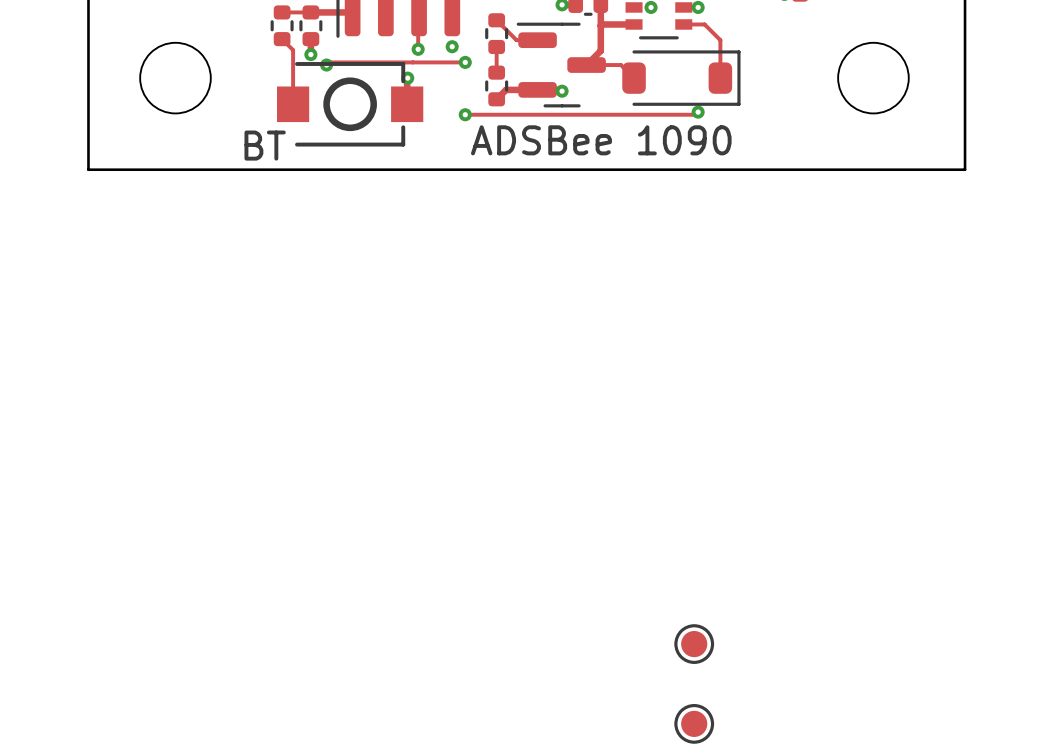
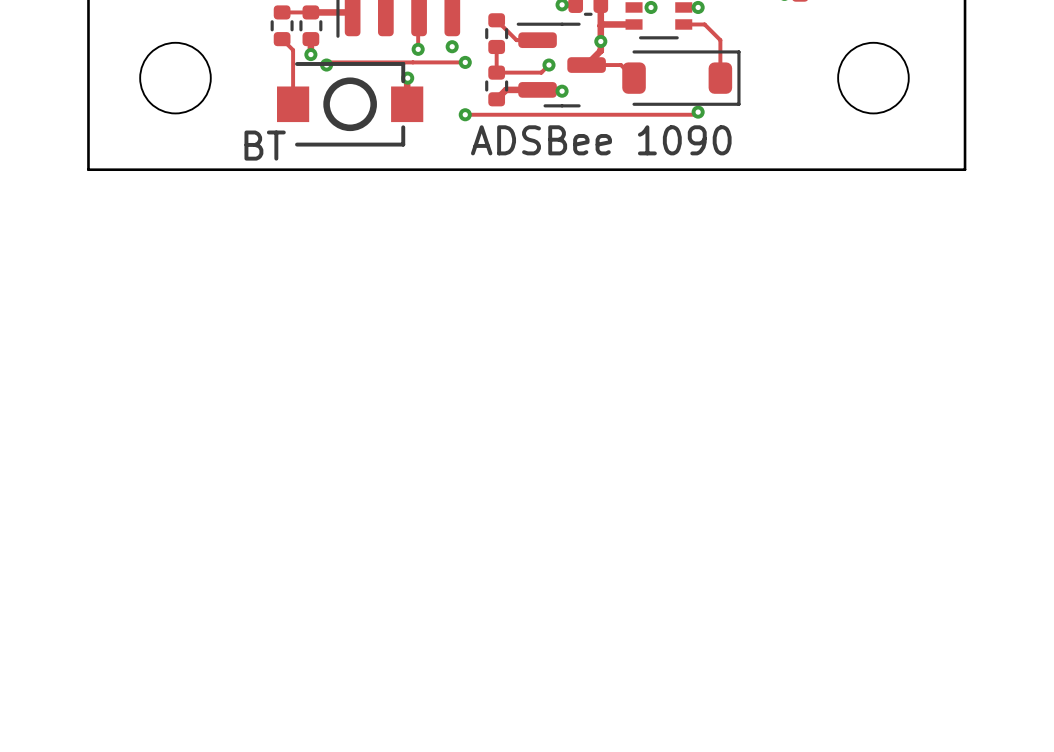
via: none -> (600, 41)
track: none -> (548, 65) (541, 72) (496, 72)
via: none -> (548, 65)
part: (694, 644) -> none
part: (694, 723) -> none

